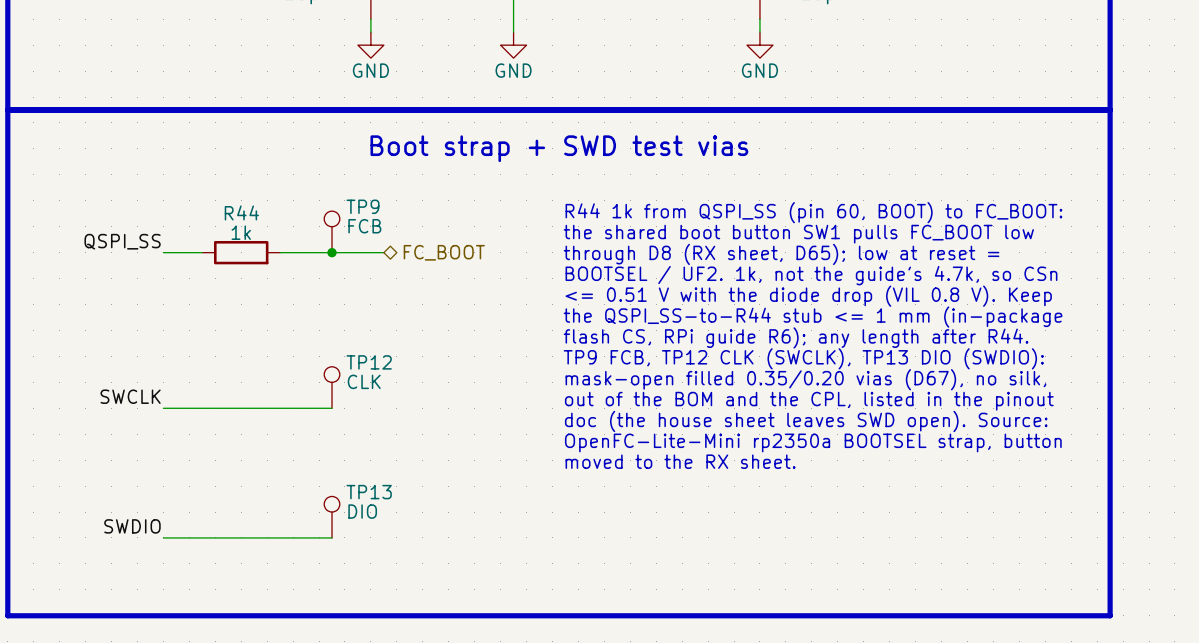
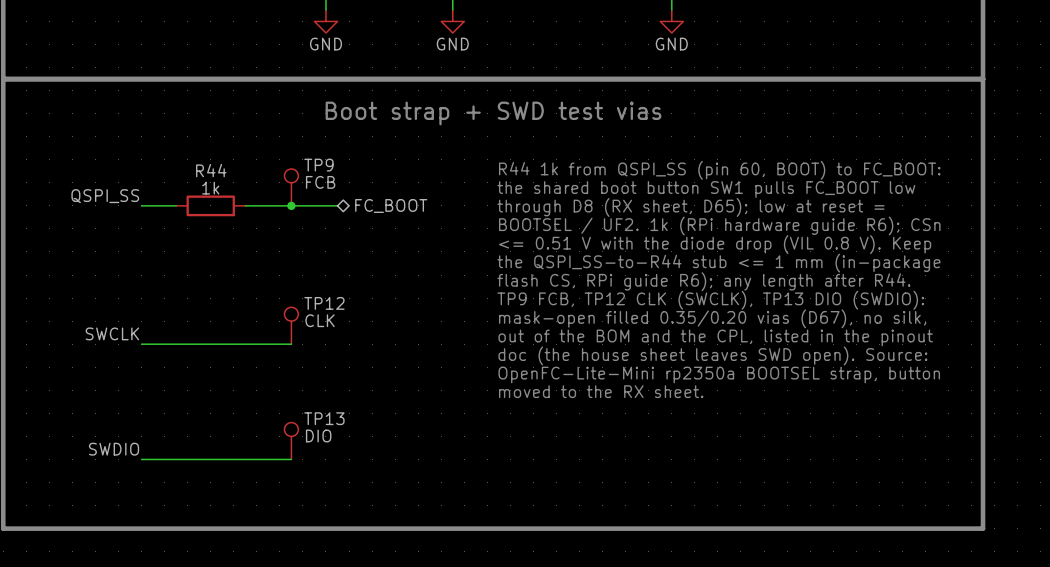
text: BOOTSEL / UF2. 1k, not the guide's 4.7k, so CSn (811, 275) -> BOOTSEL / UF2. 1k (RPi hardware guide R6); CSn (719, 226)

